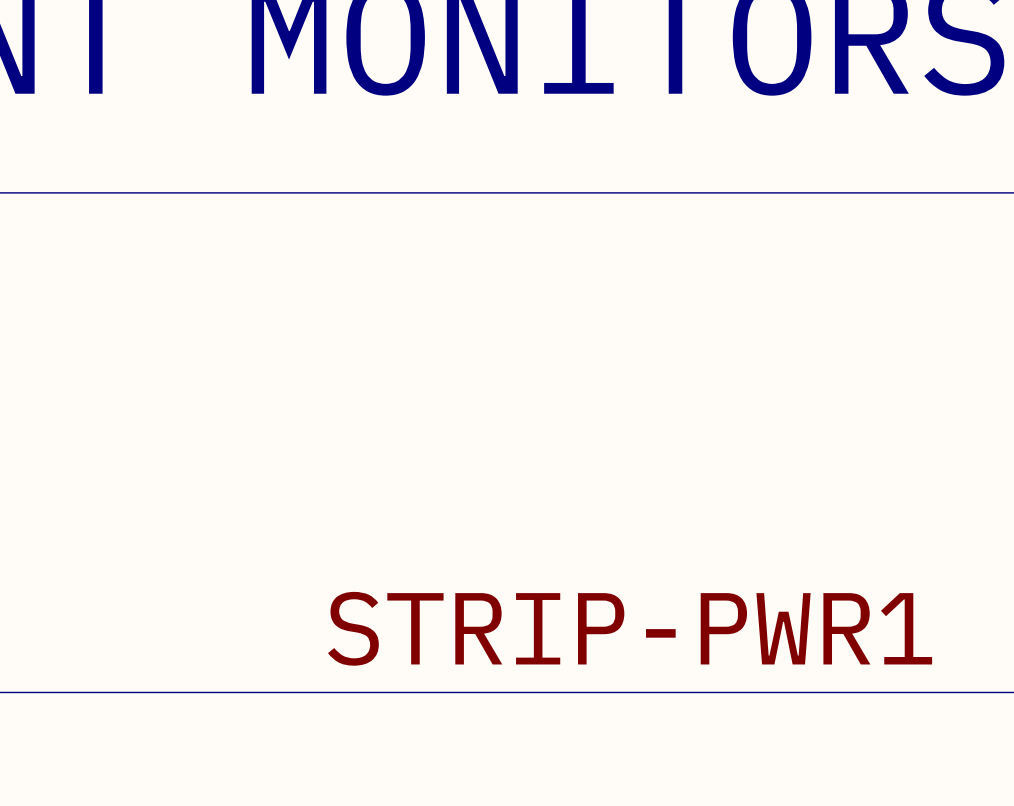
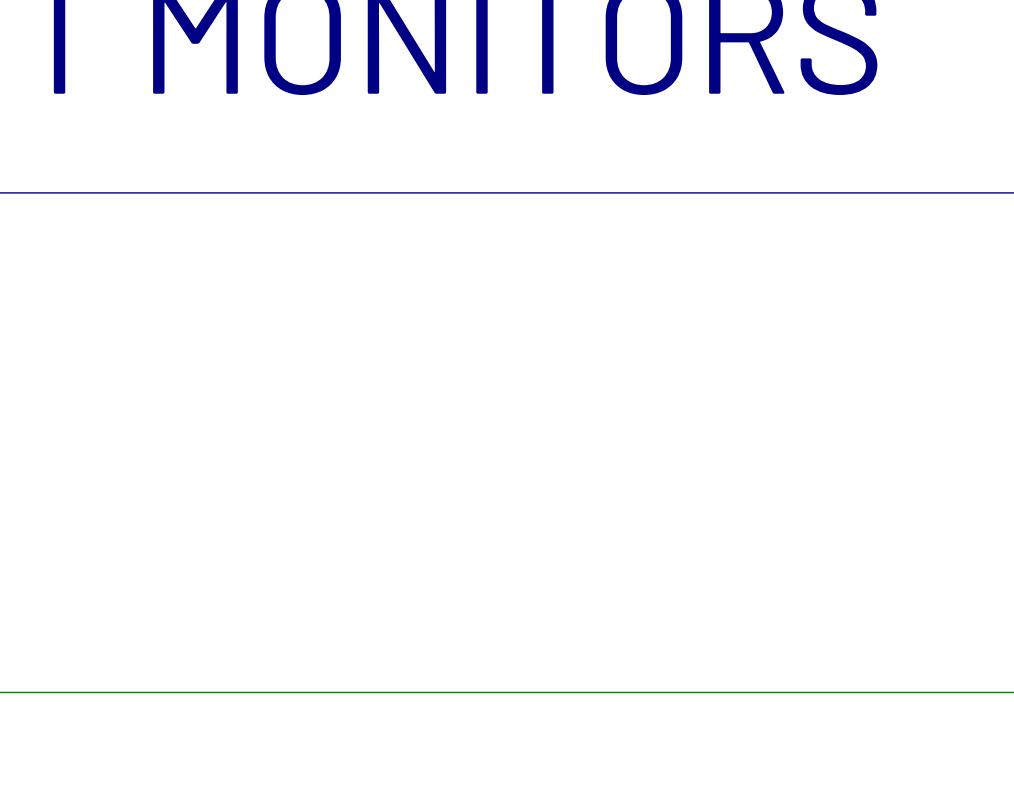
label: STRIP-PWR1 (630, 628) -> none

